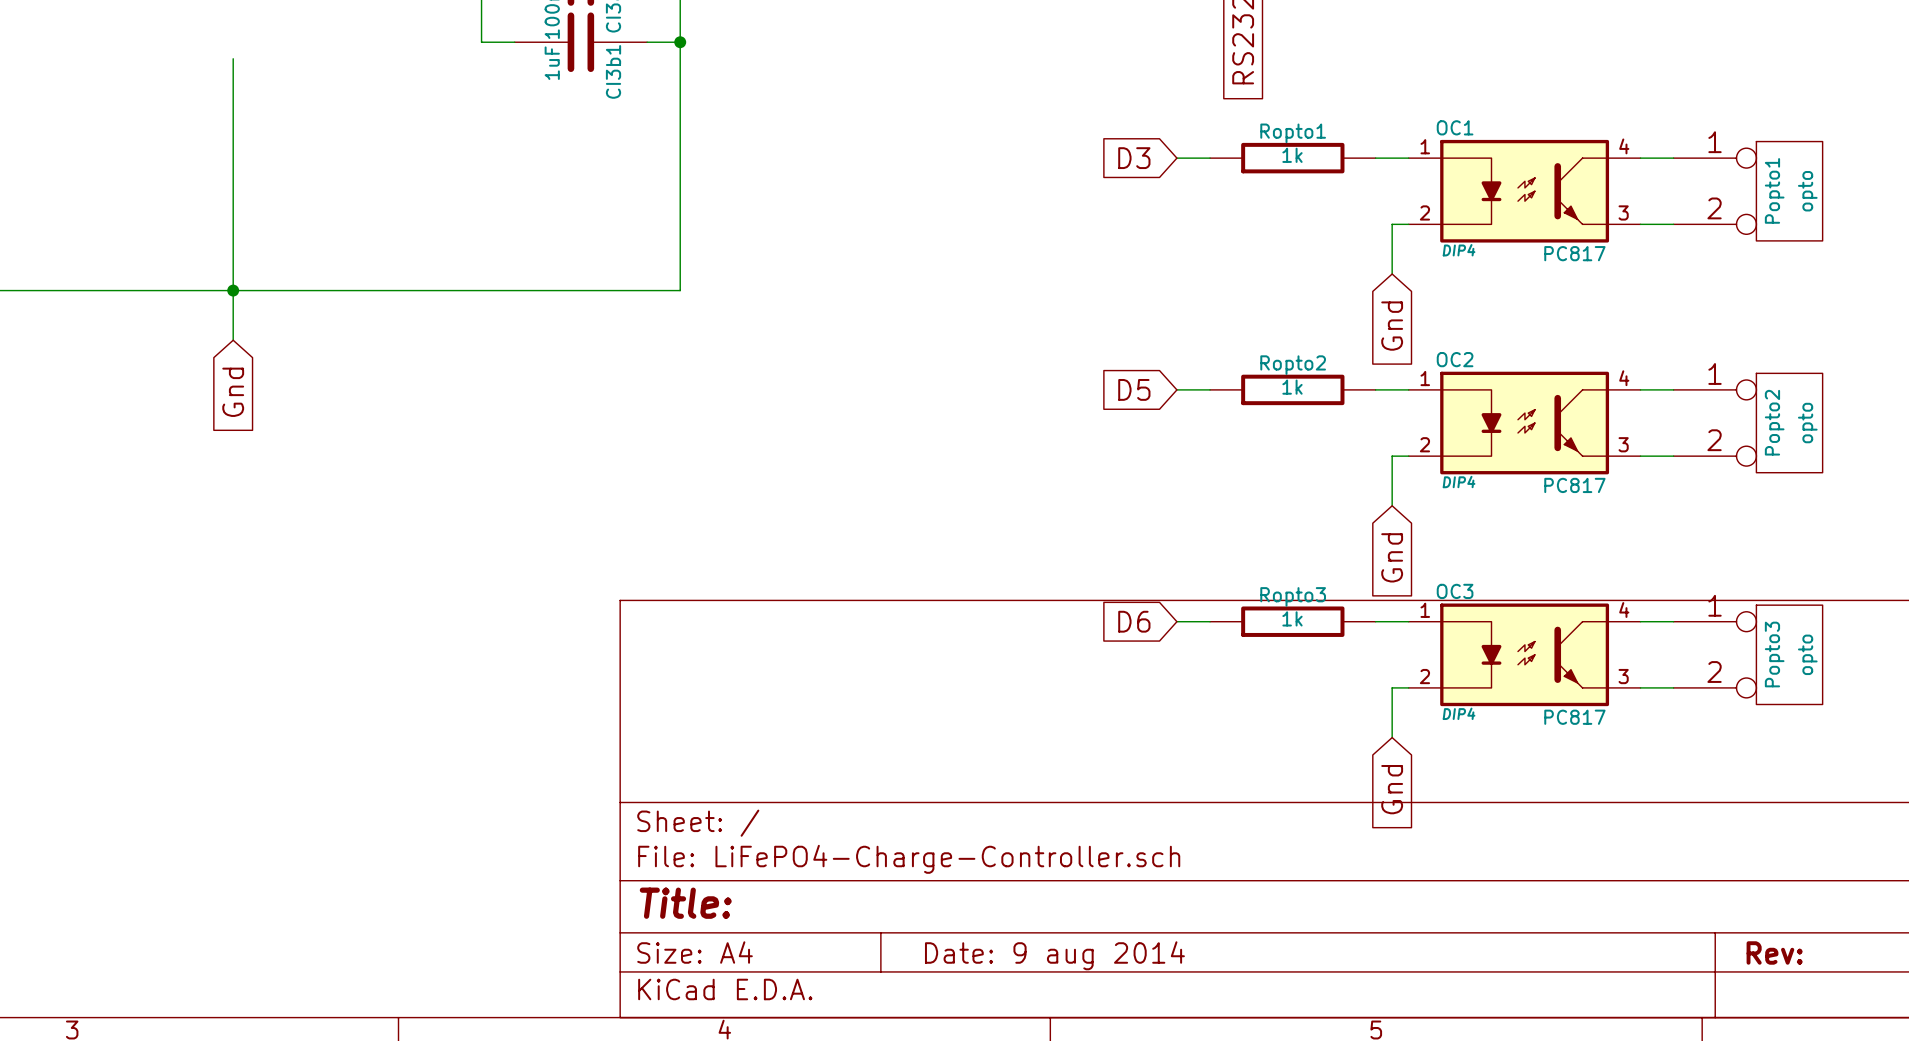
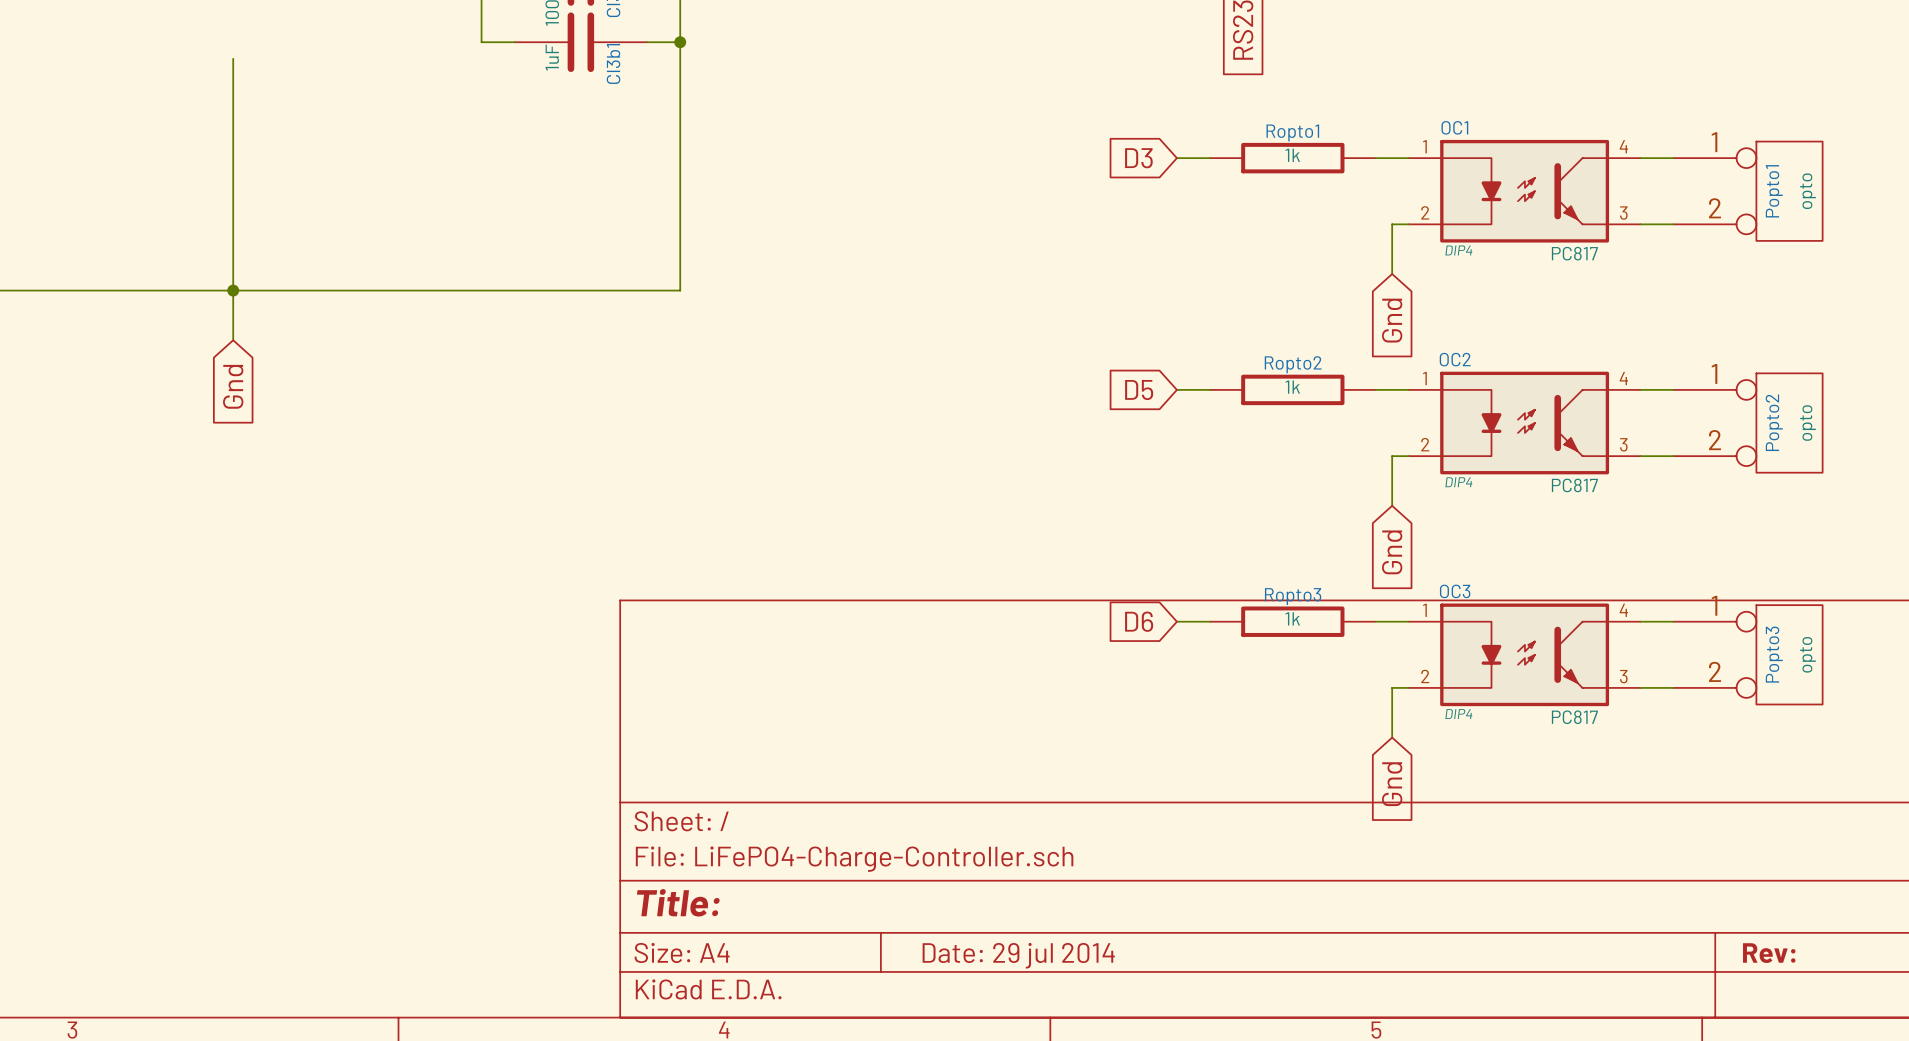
title block: Date: 9 aug 2014 (1054, 955) -> Date: 29 jul 2014 (1018, 955)

